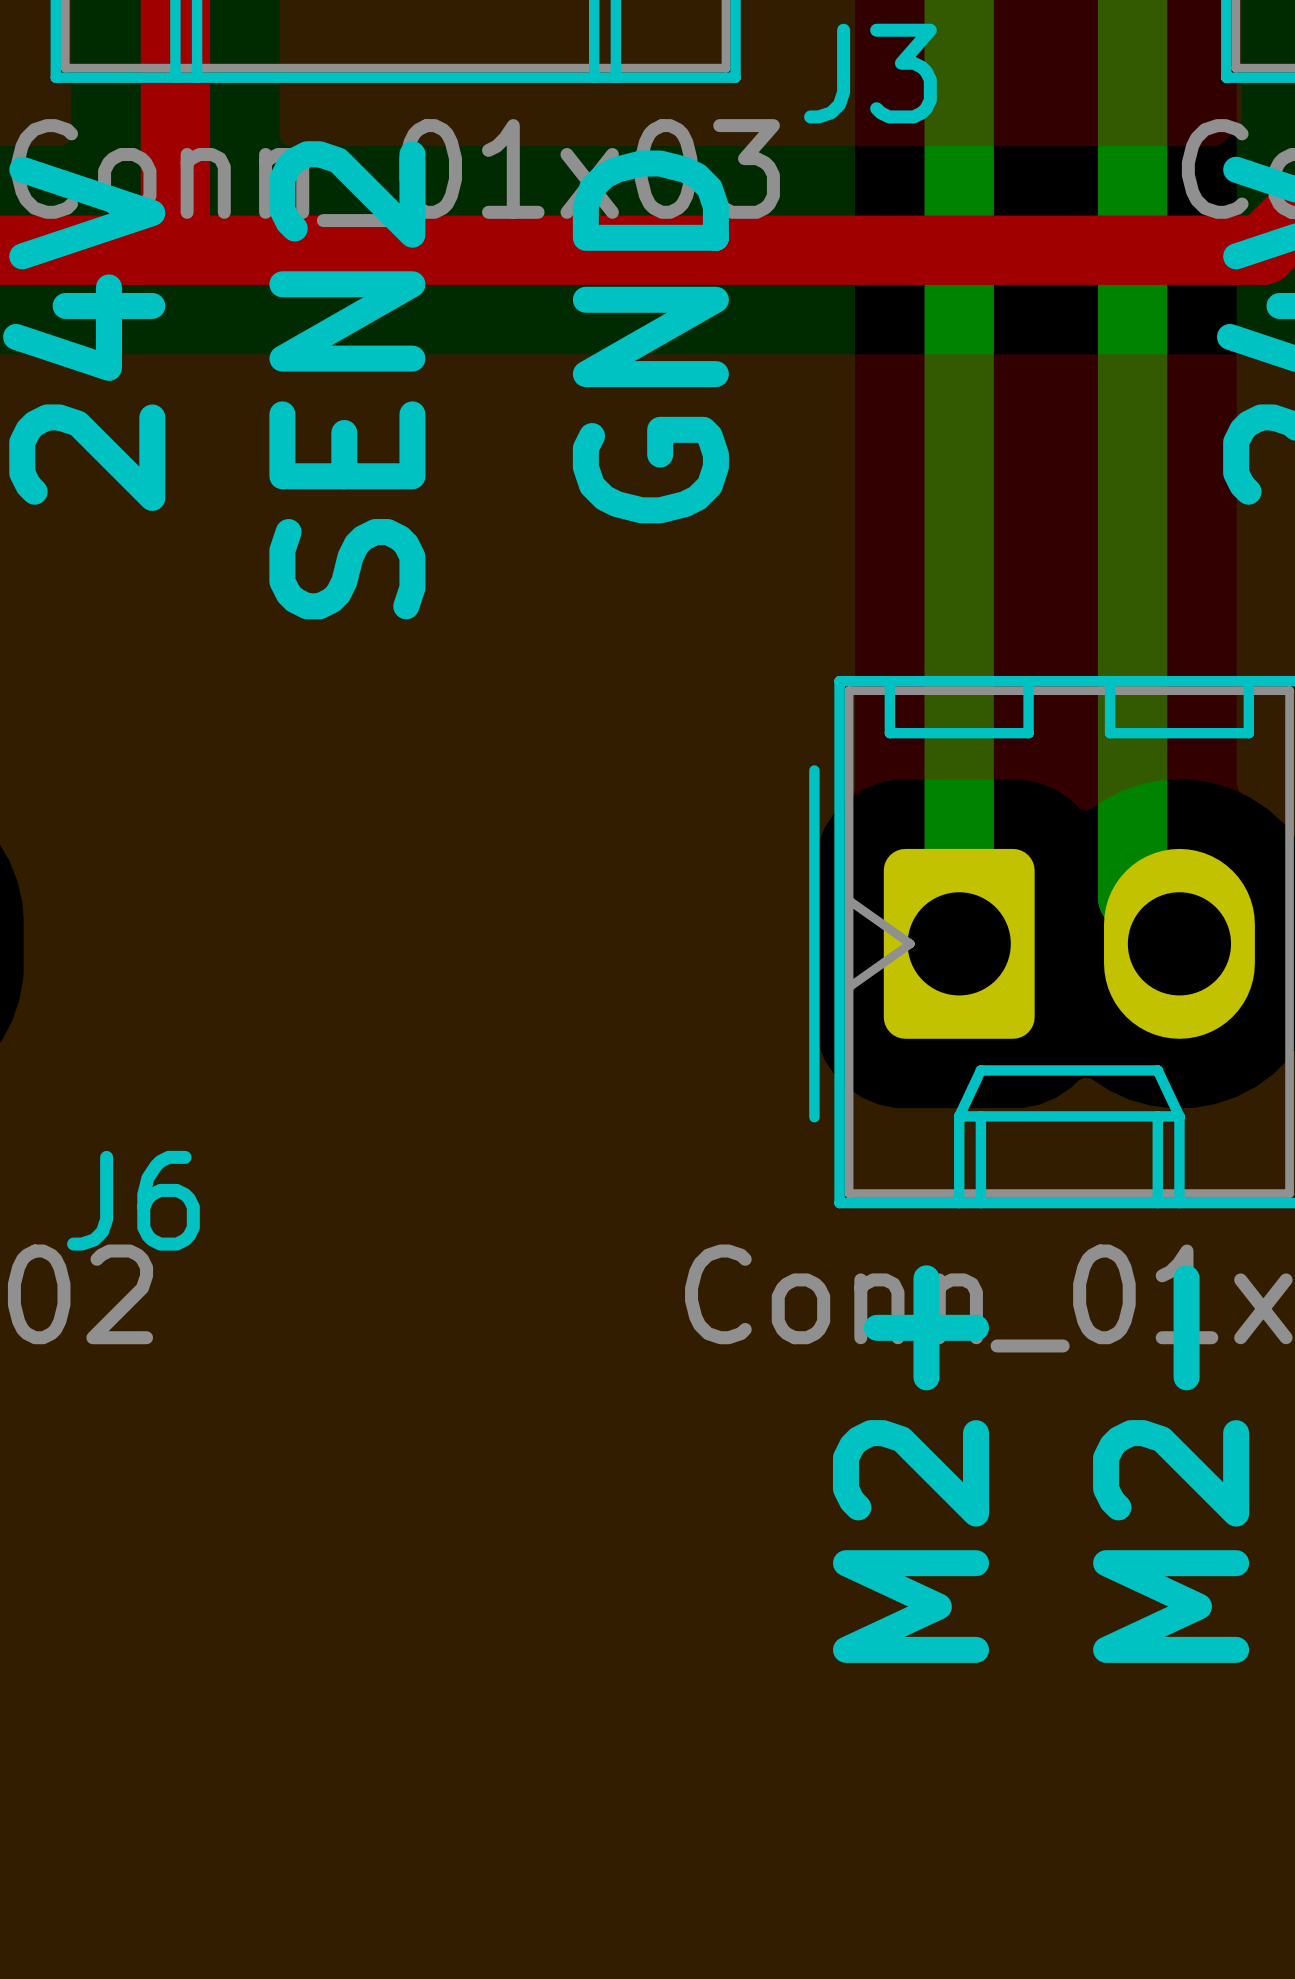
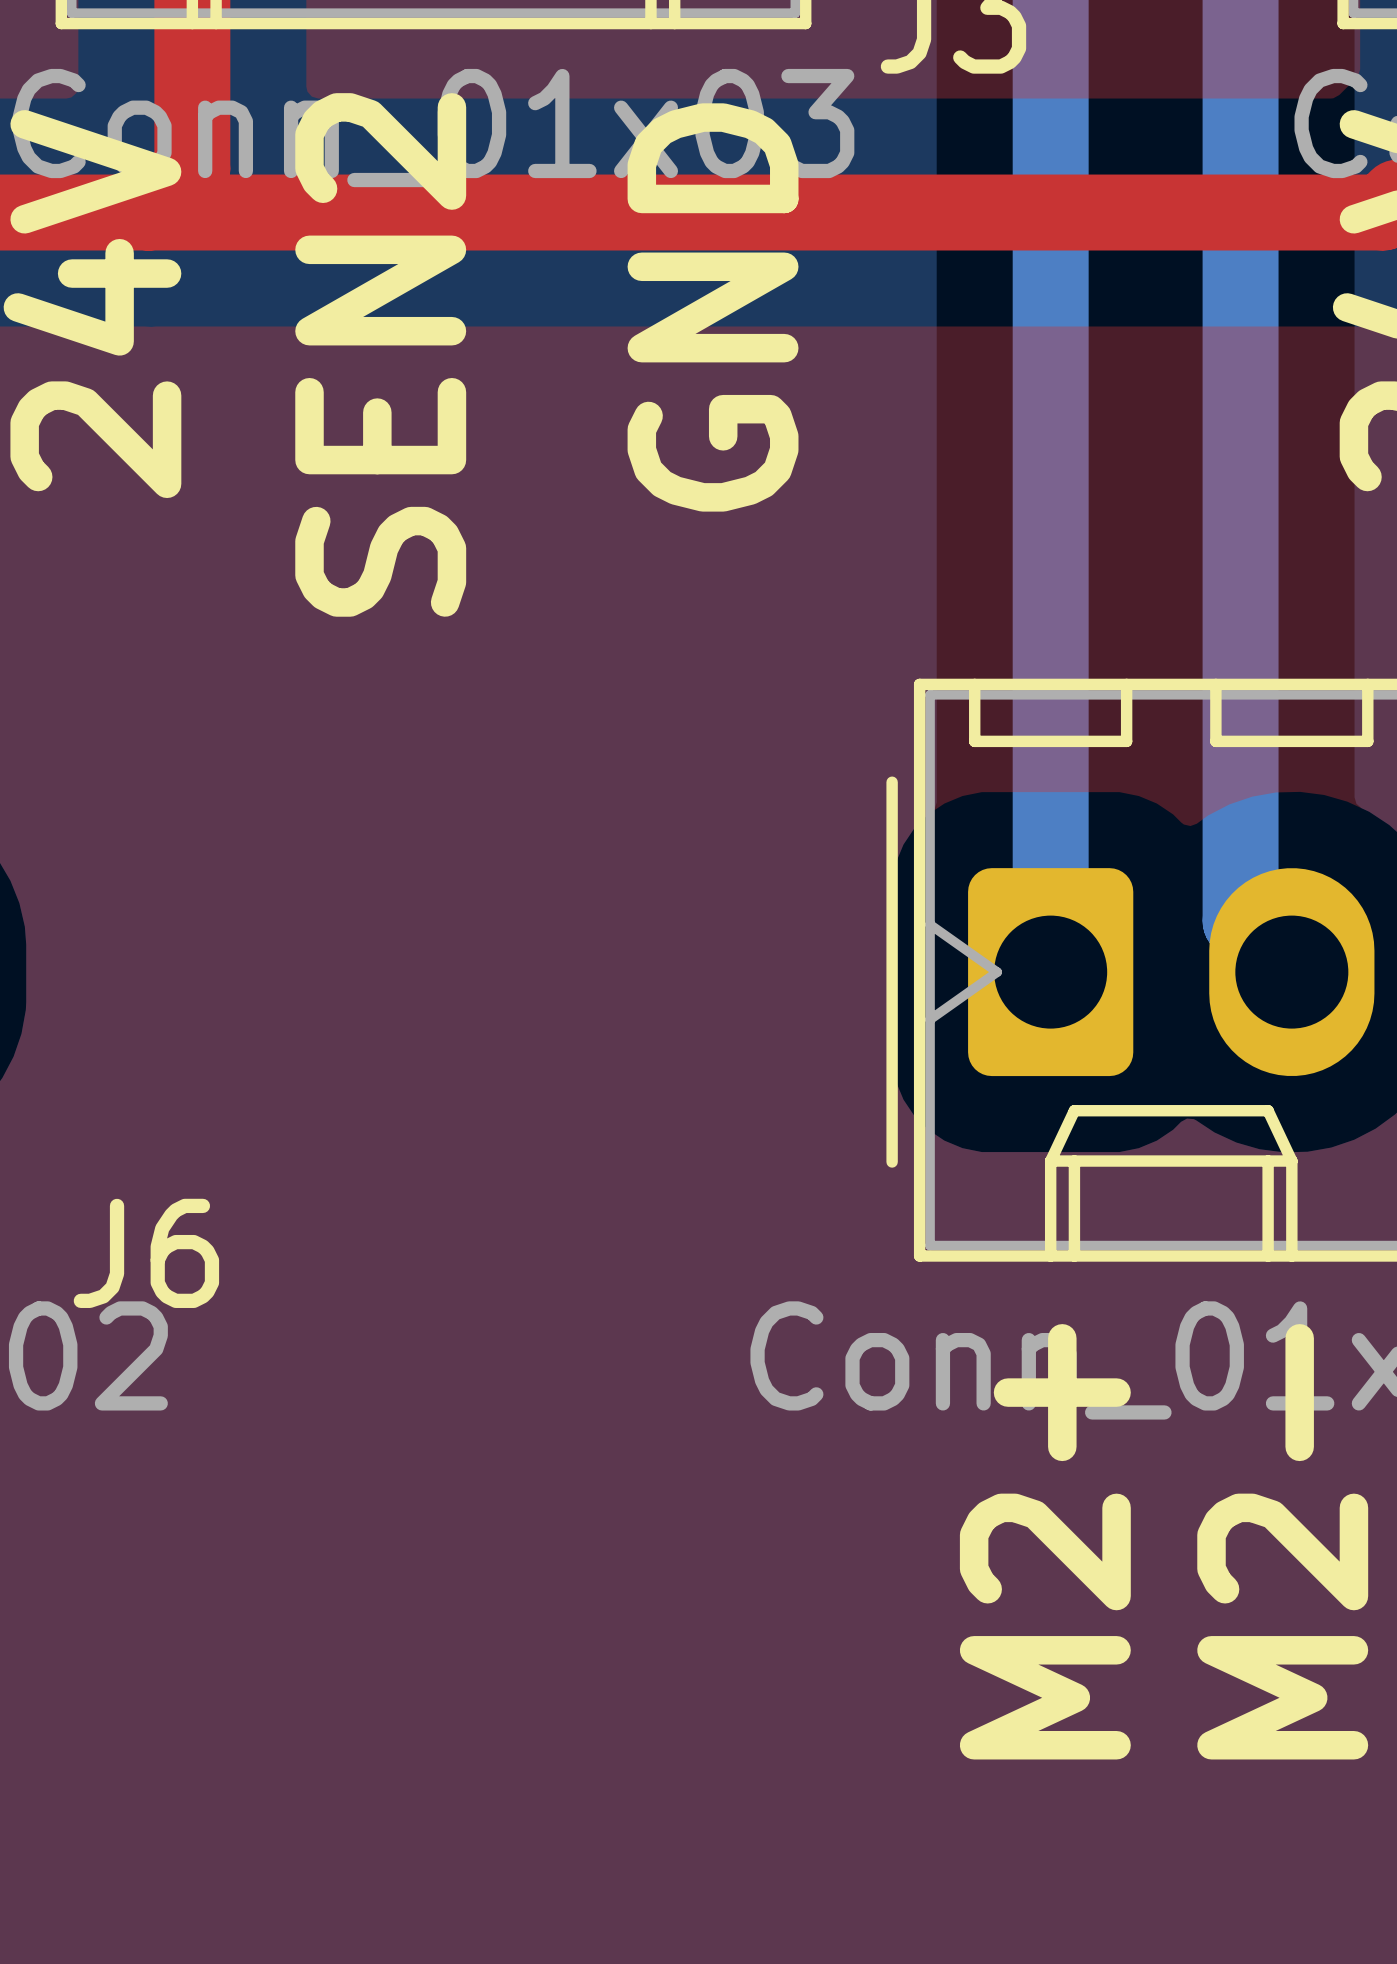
text position: M2+ (911, 1464) -> M2+ (1045, 1541)

